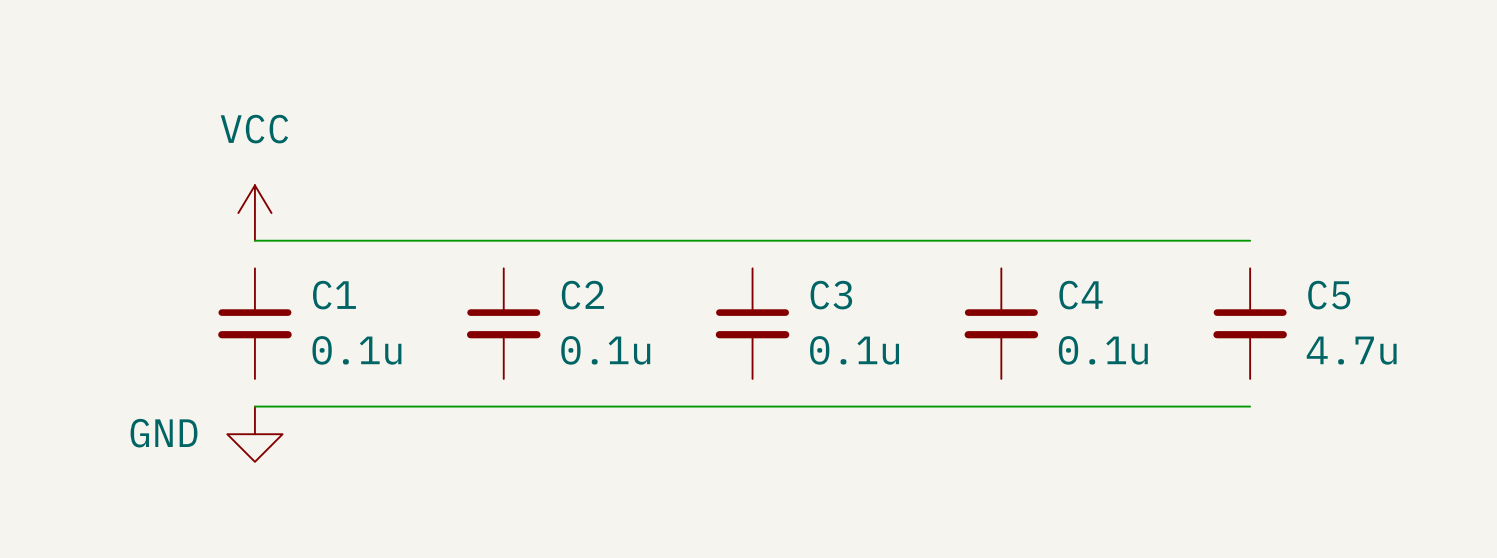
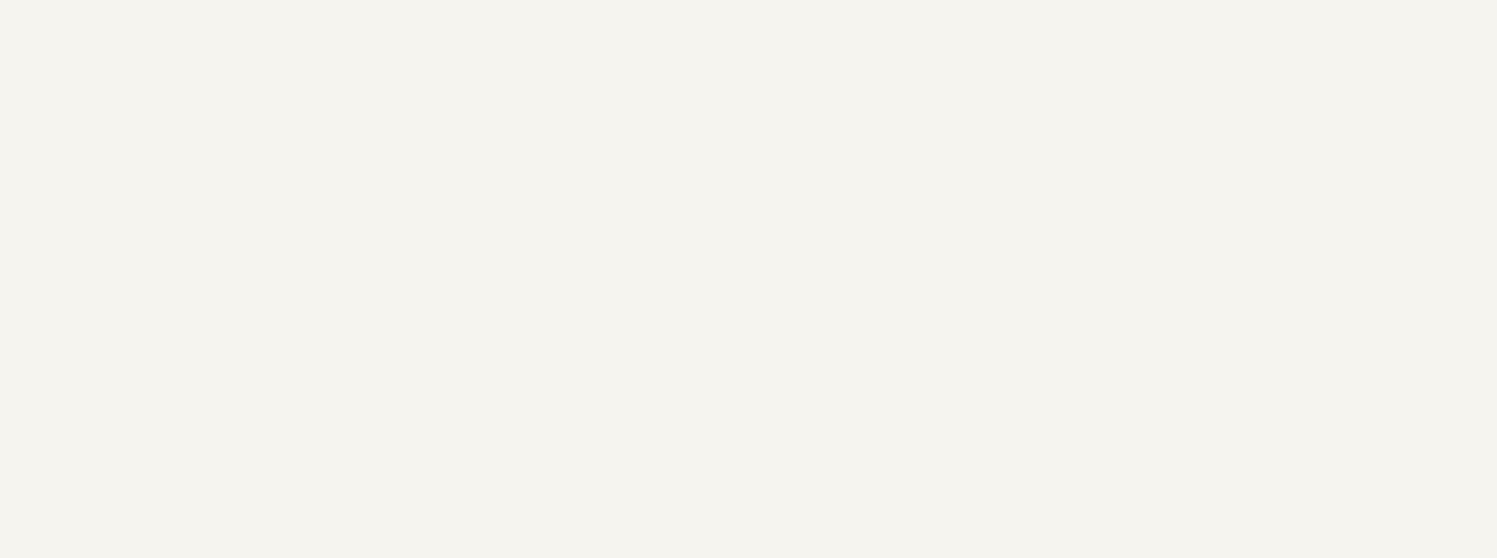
power symbol: VCC (254, 213) -> none
wire: (254, 240) (1250, 240) -> none
C1: 0.1u (254, 323) -> none
C2: 0.1u (503, 323) -> none
C3: 0.1u (752, 323) -> none
C4: 0.1u (1001, 323) -> none
C5: 4.7u (1250, 323) -> none
wire: (254, 406) (1250, 406) -> none
power symbol: GND (254, 434) -> none

